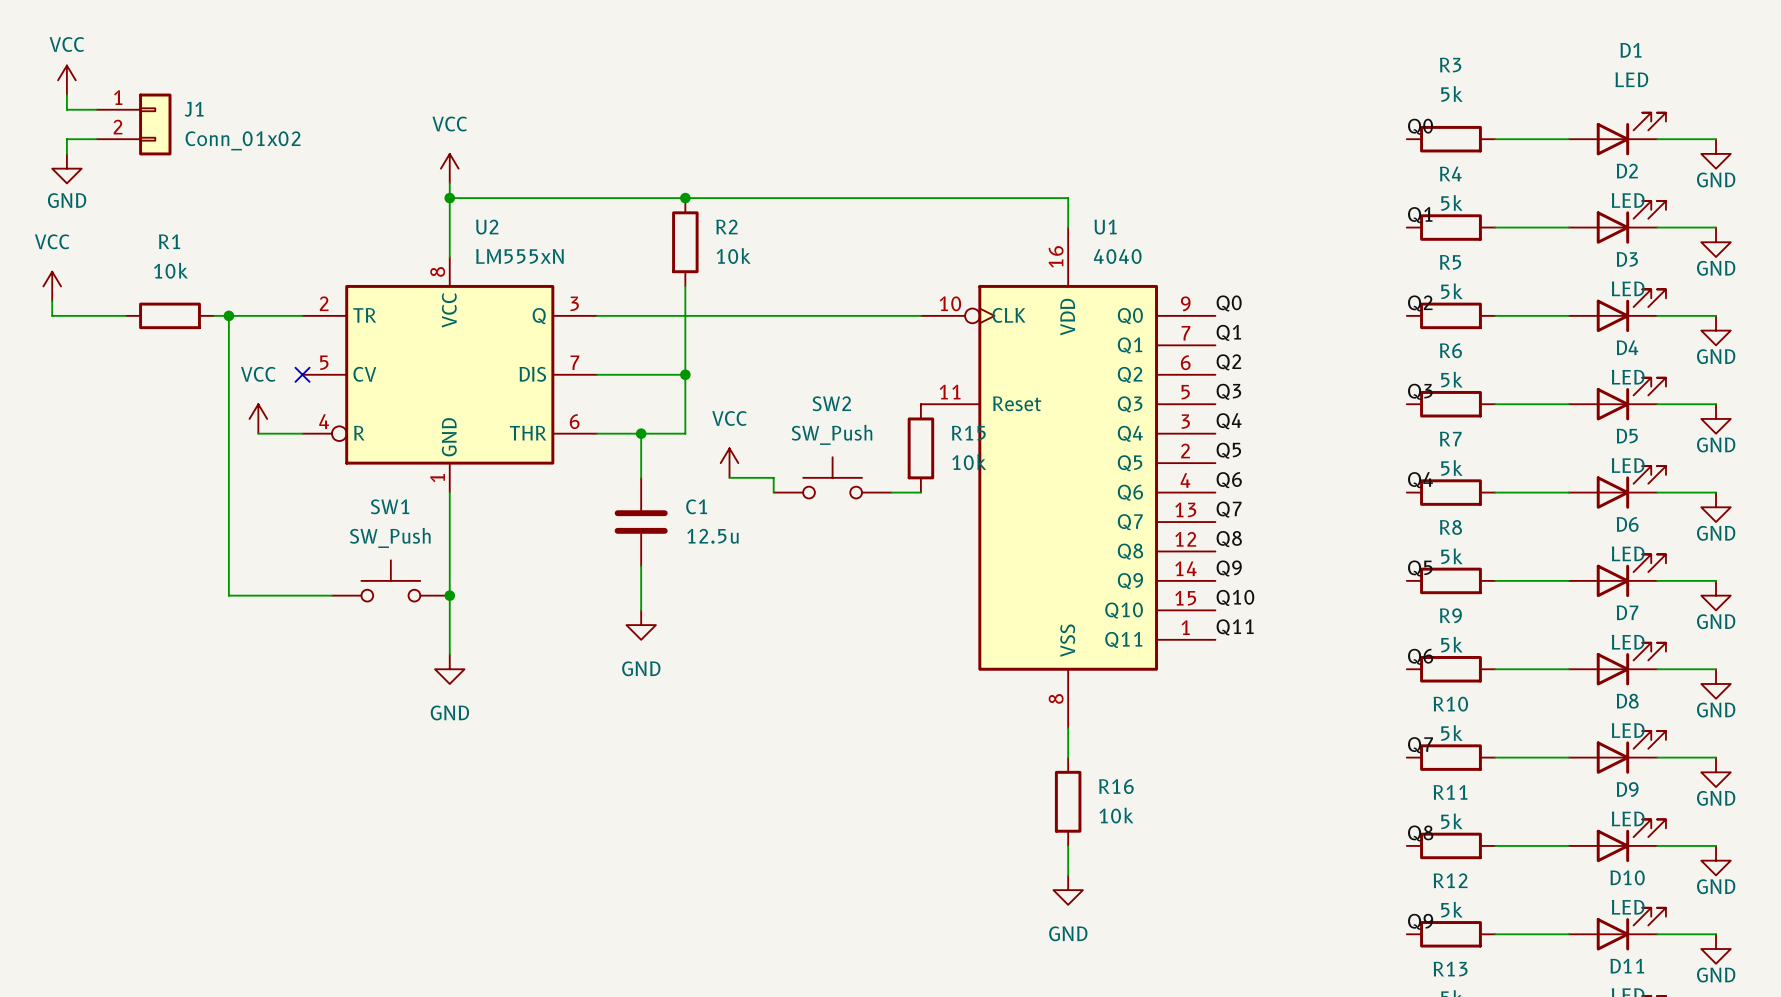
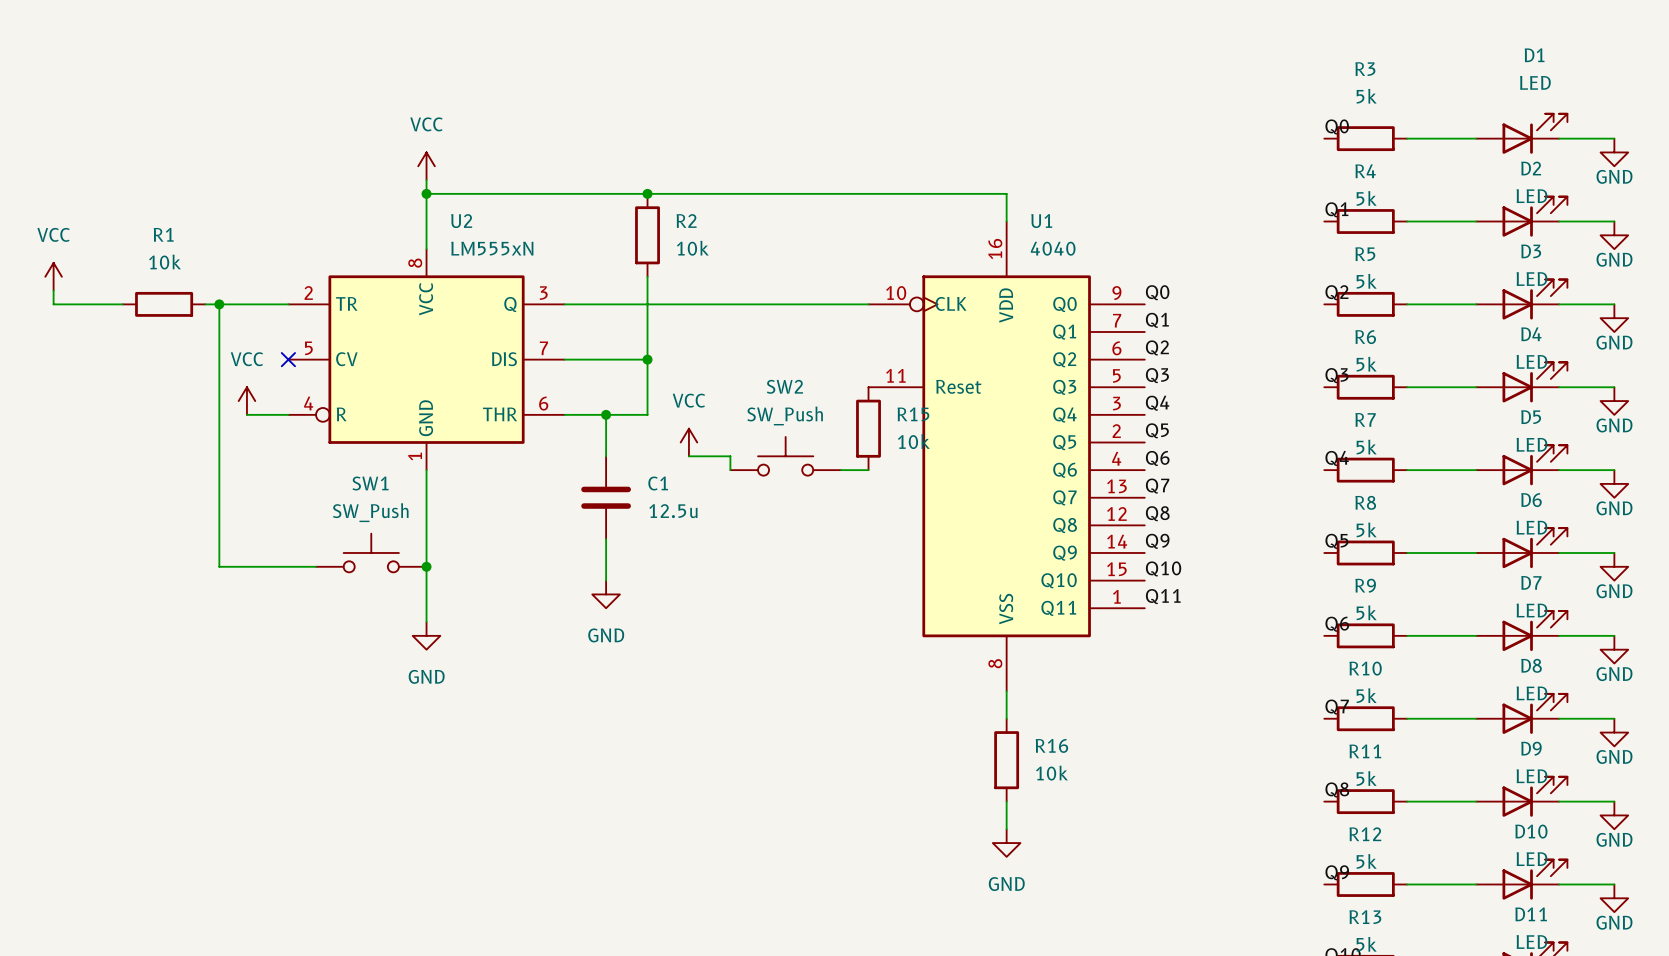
power symbol: VCC (66, 80) -> none
wire: (66, 95) (66, 109) (96, 109) -> none
J1: Conn_01x02 (133, 124) -> none
wire: (96, 139) (66, 139) (66, 153) -> none
power symbol: GND (66, 168) -> none

